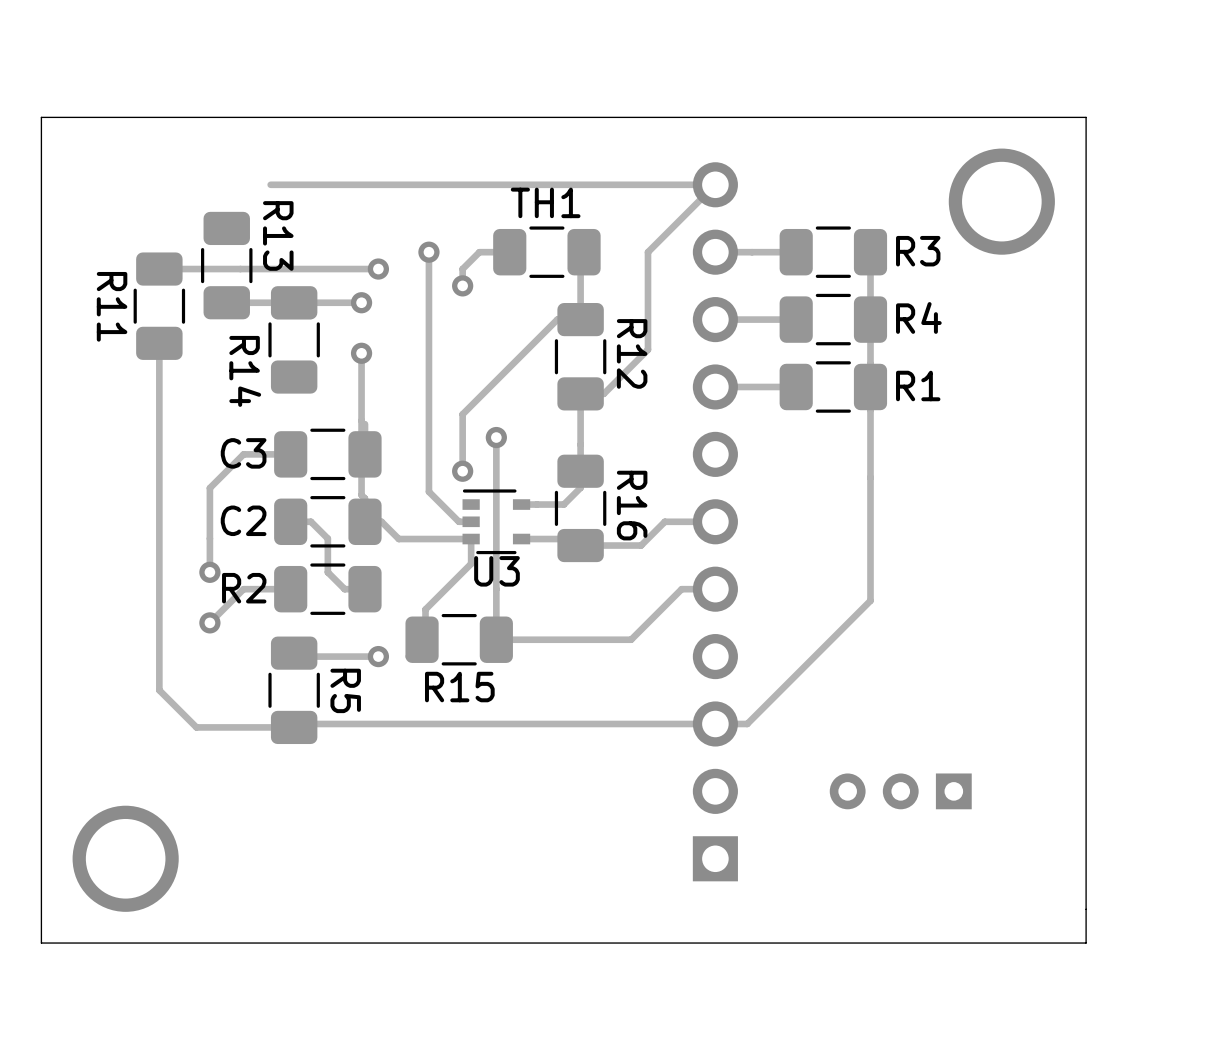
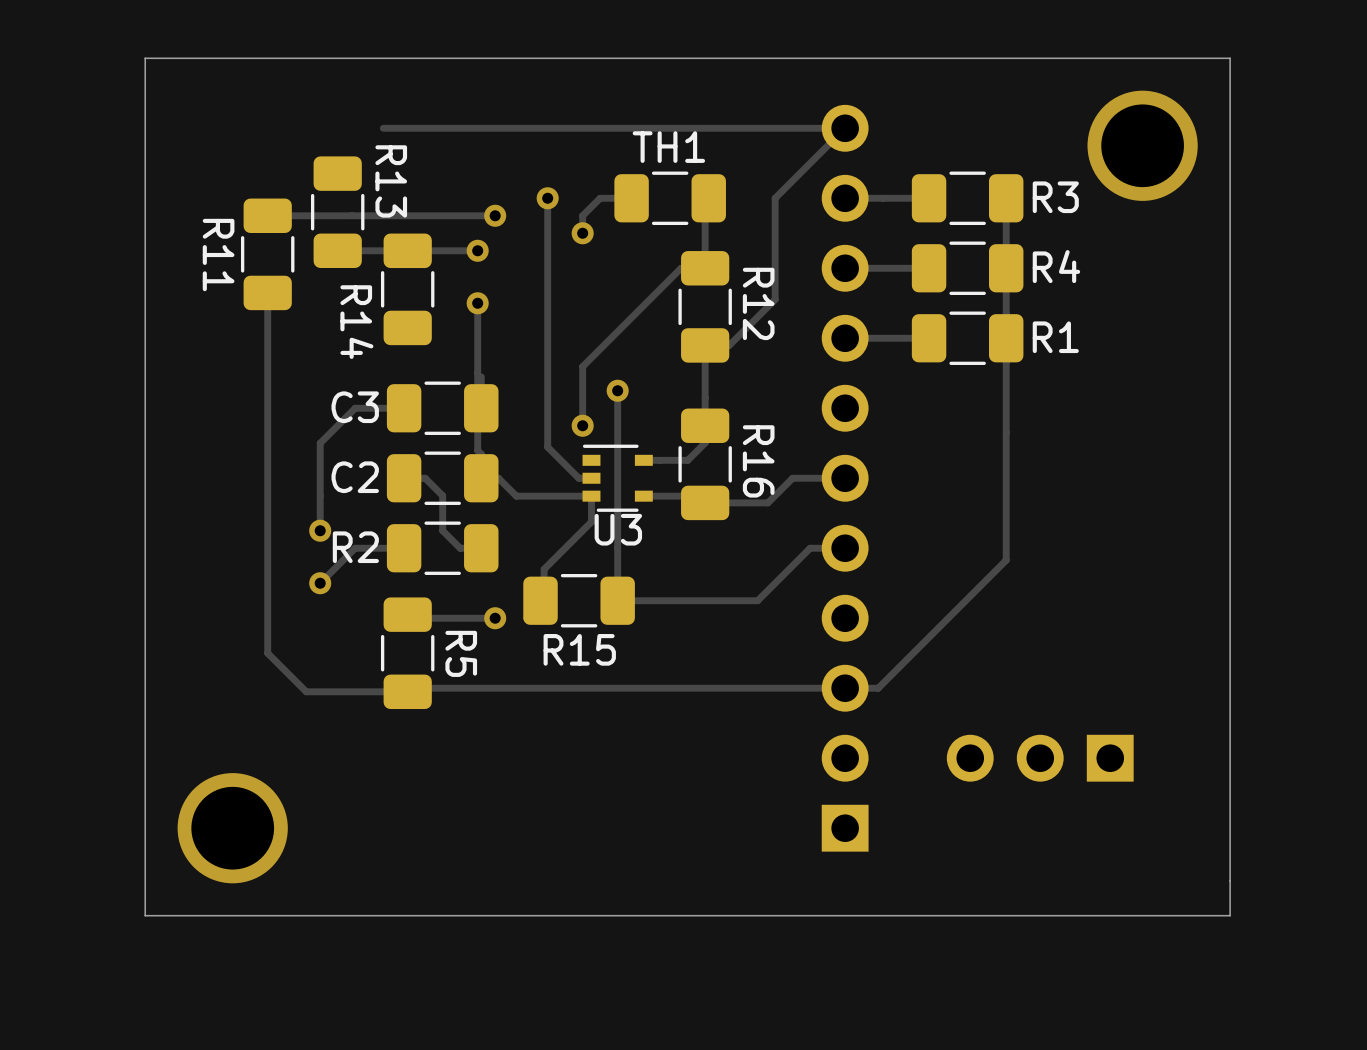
part footprint: [829, 773, 972, 810] -> [946, 734, 1134, 782]

